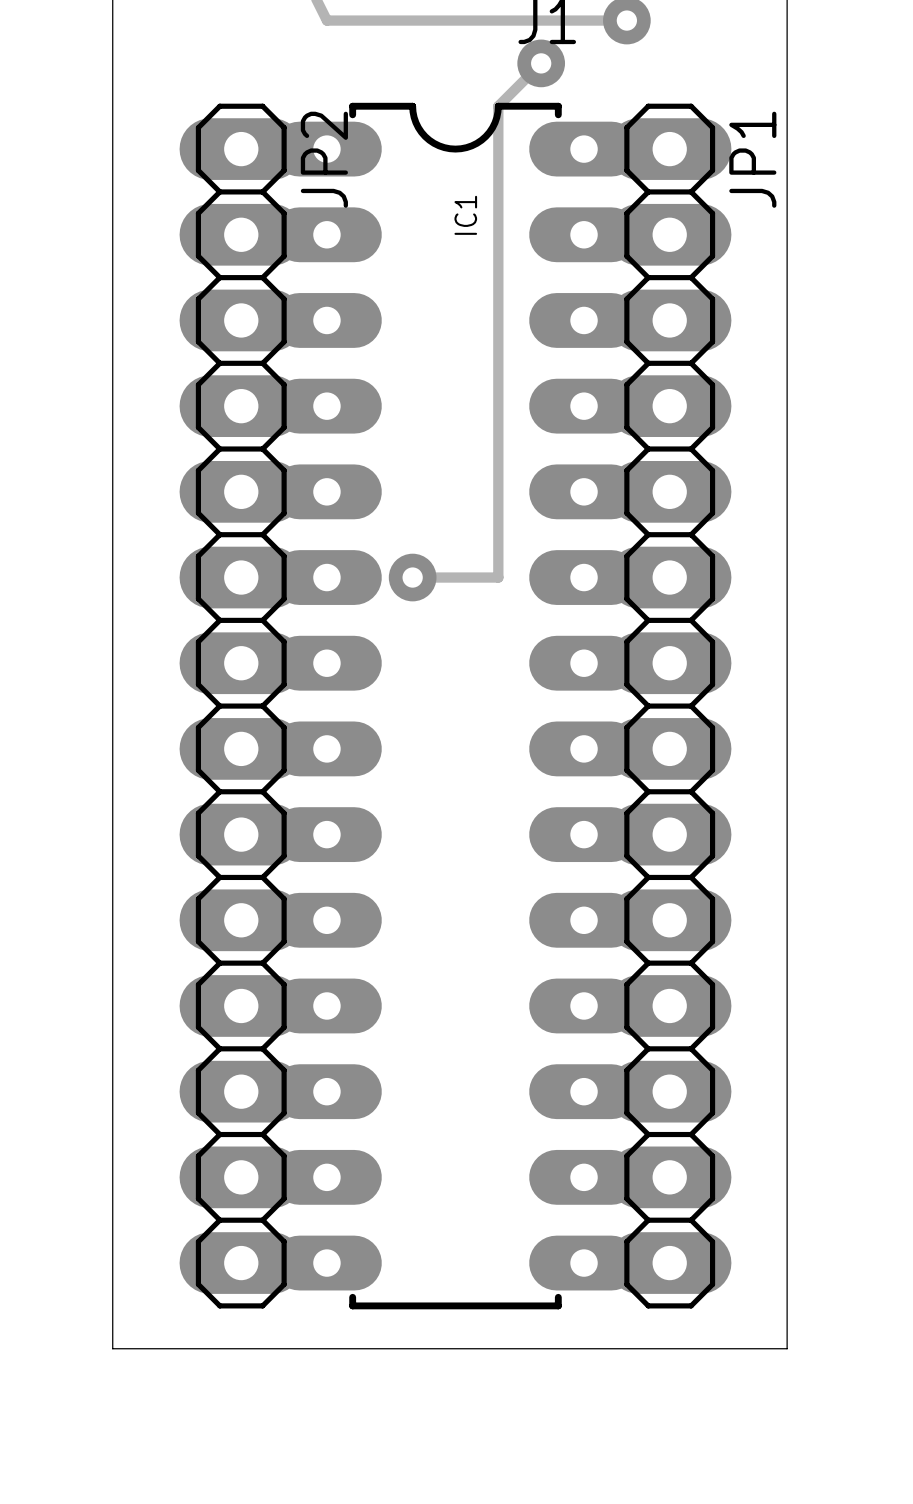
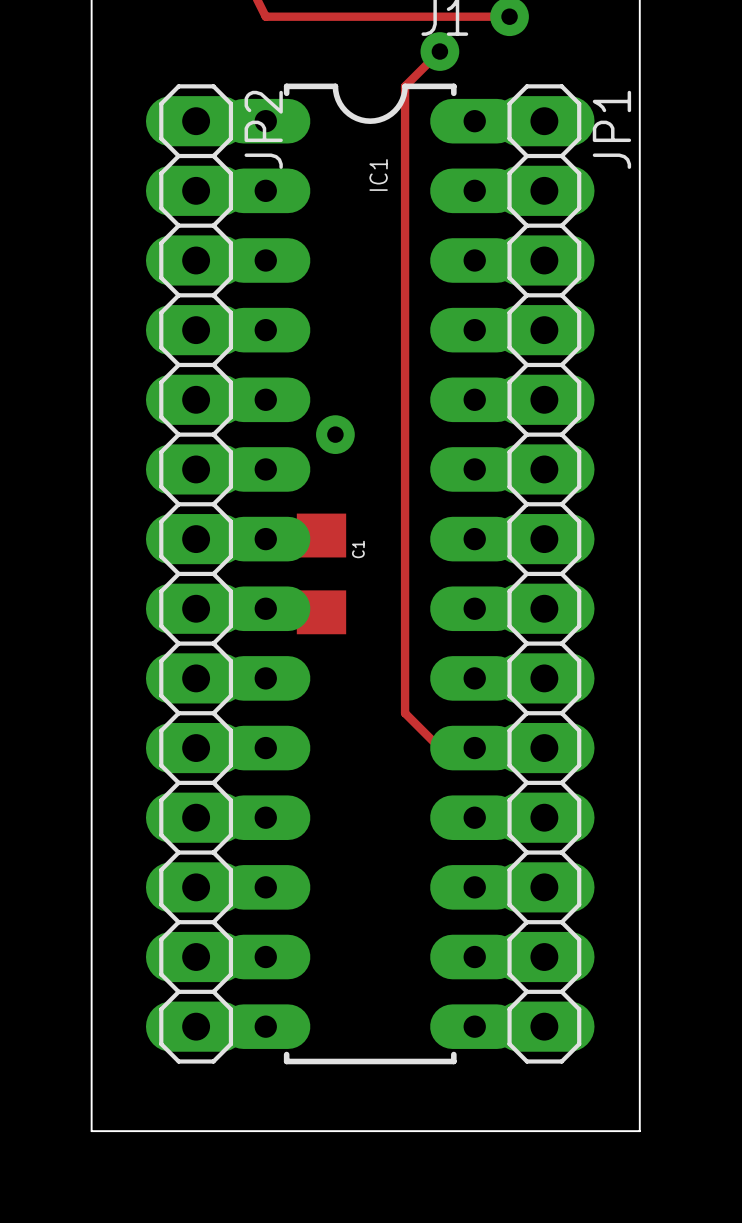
track: (412, 577) (498, 577) -> (544, 748) (439, 748) (405, 713) (405, 469)
via position: (412, 577) -> (335, 434)
C1: none -> (321, 573)
board edge: (112, 1348) (787, 1348) -> (91, 1096) (91, 1131) (639, 1131) (639, 1096)

